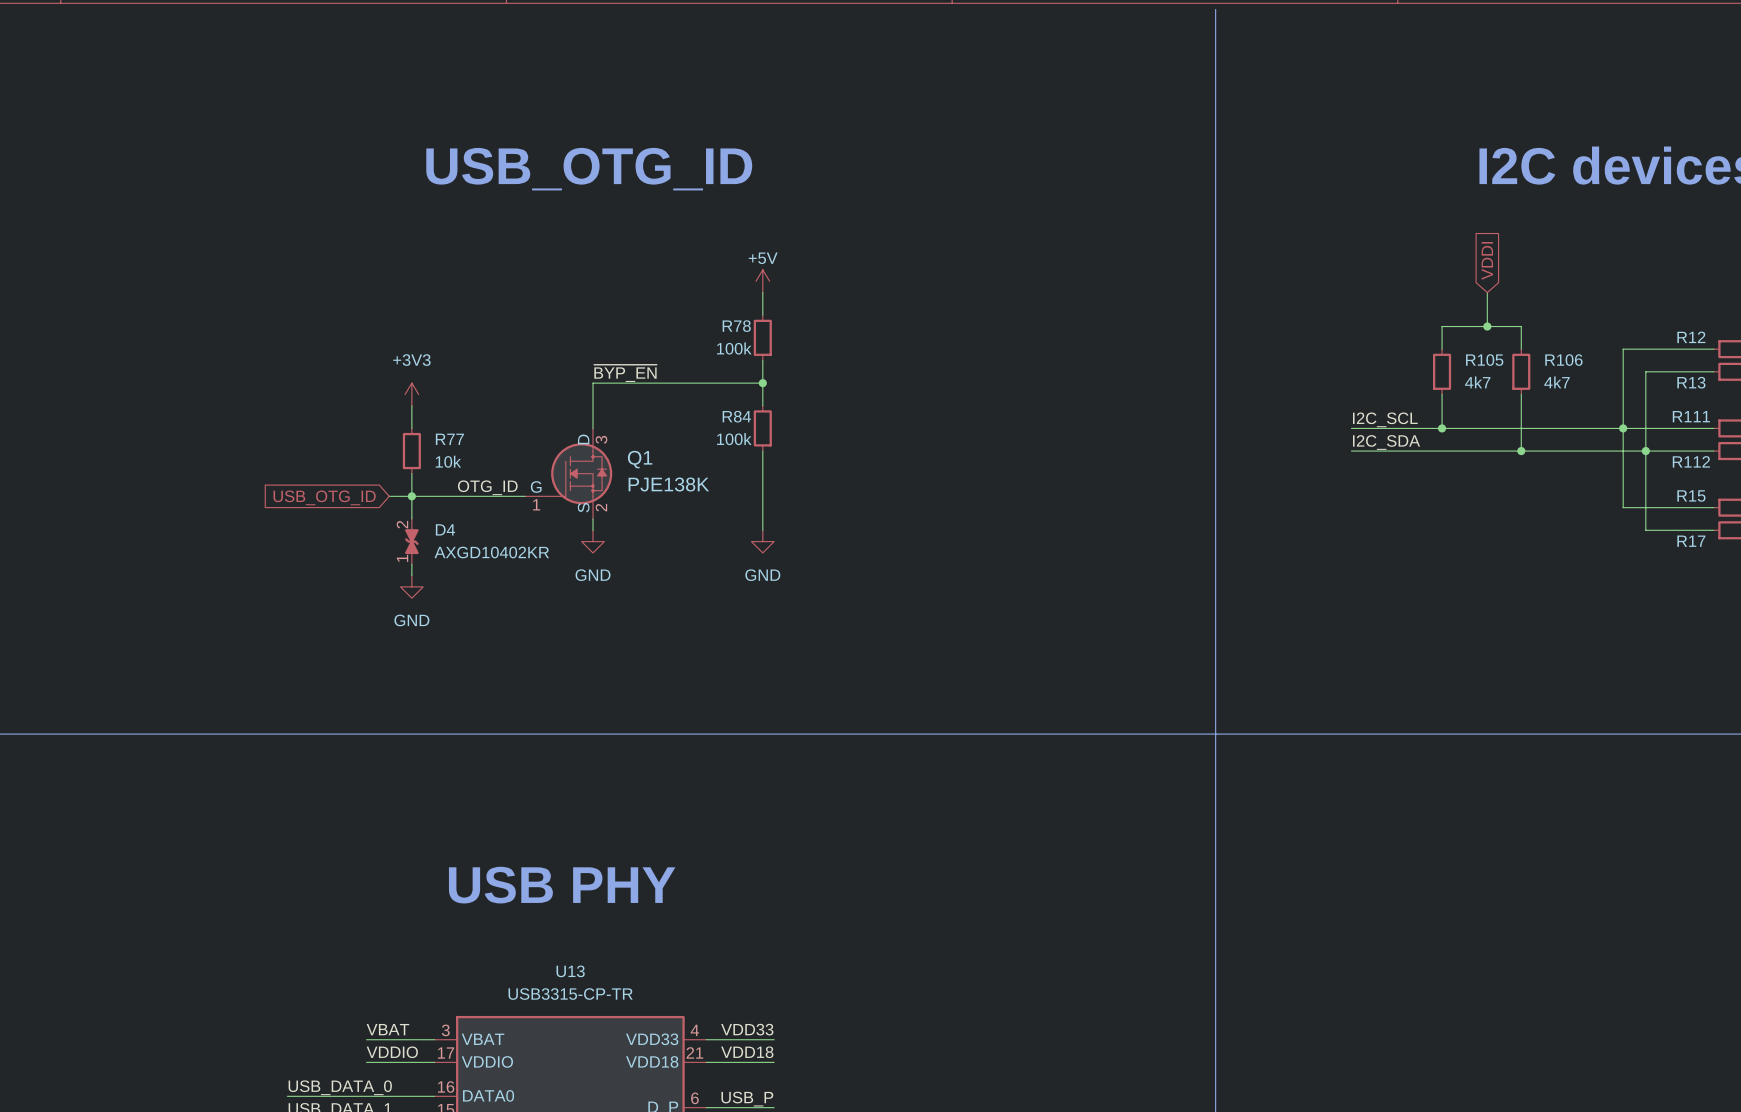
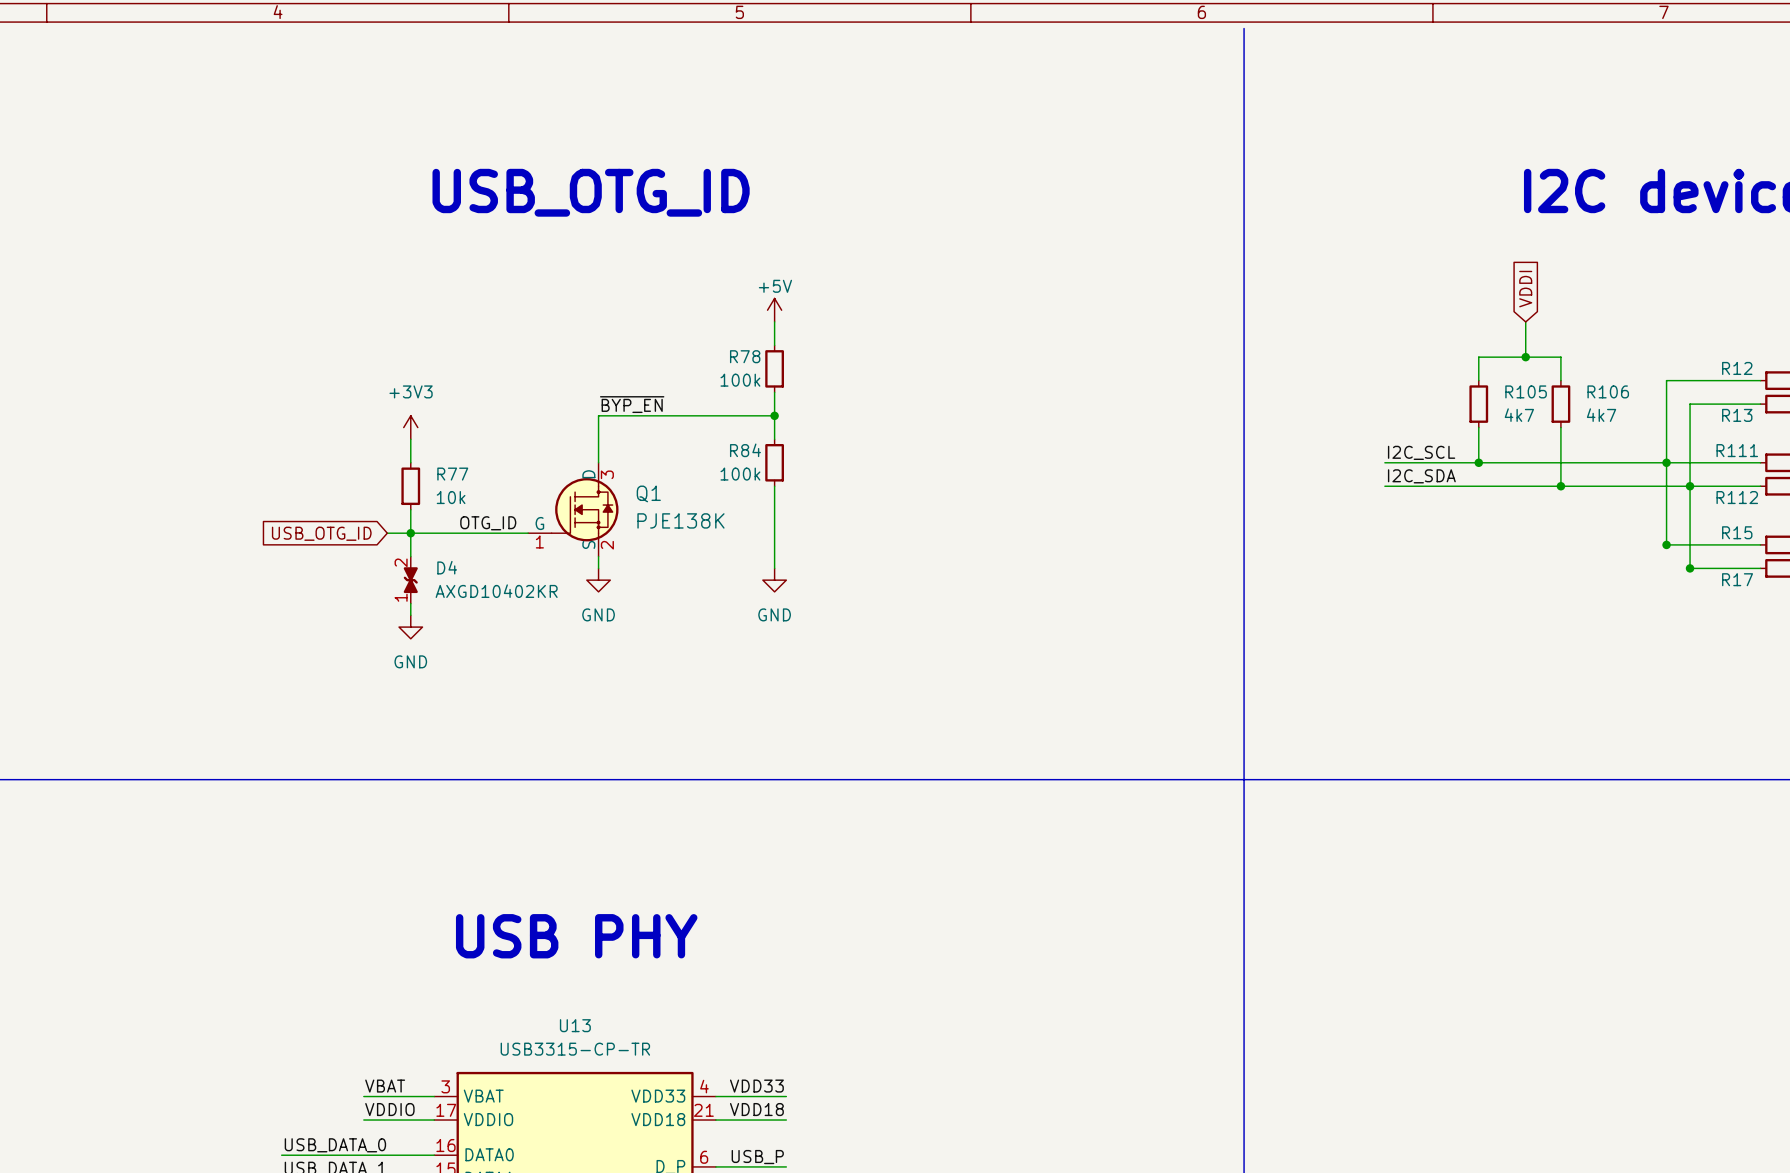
junction: none -> (1666, 544)
junction: none -> (1690, 568)

